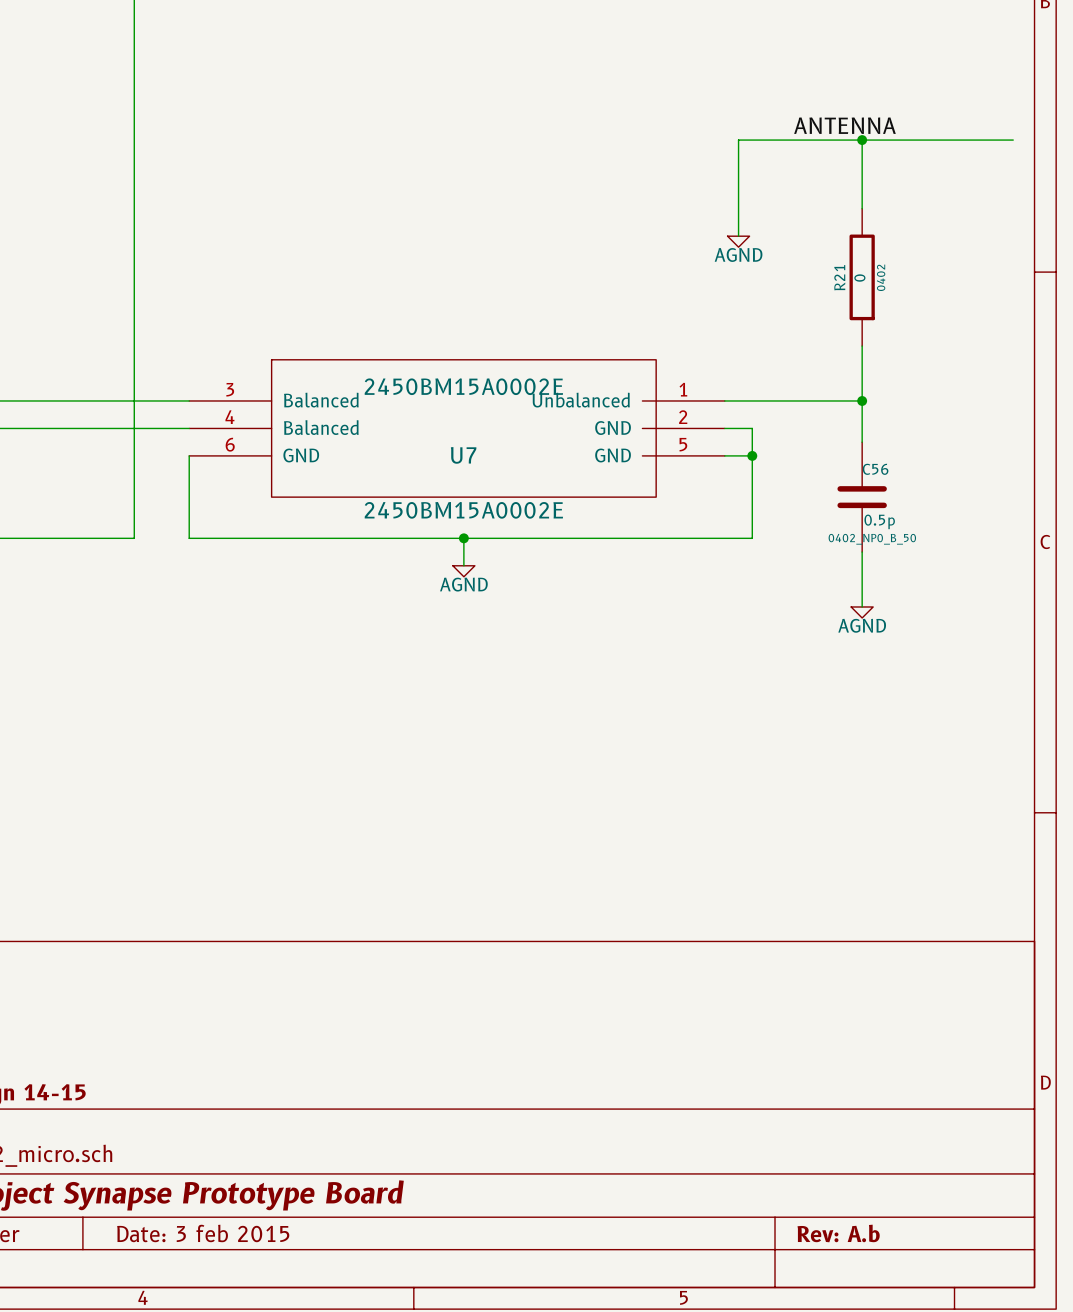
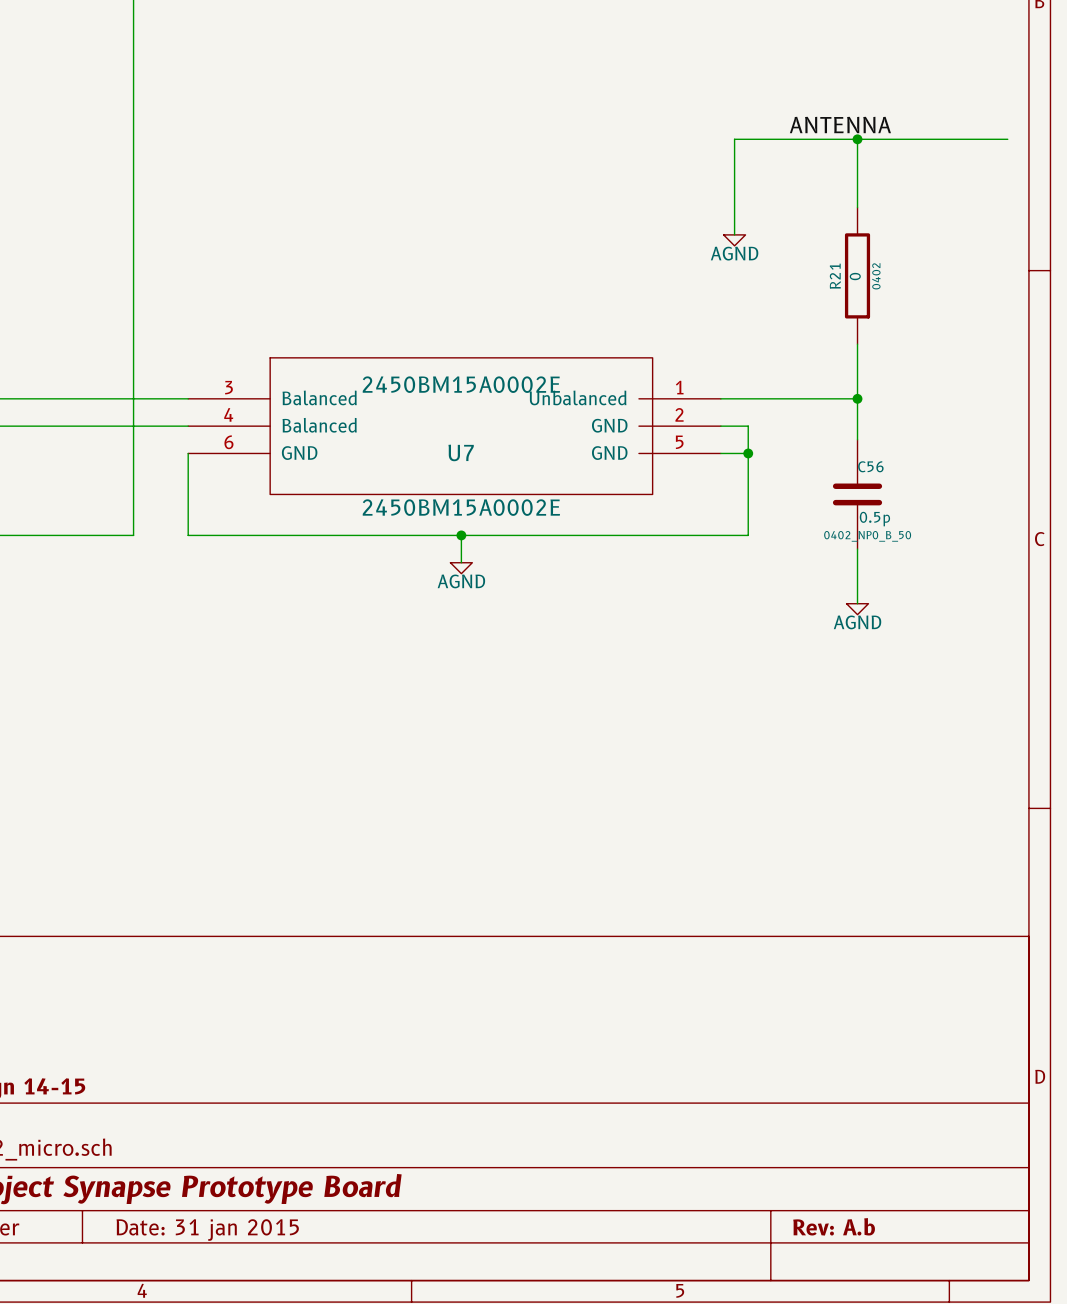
title block: Date: 3 feb 2015 (203, 1233) -> Date: 31 jan 2015 (207, 1230)

